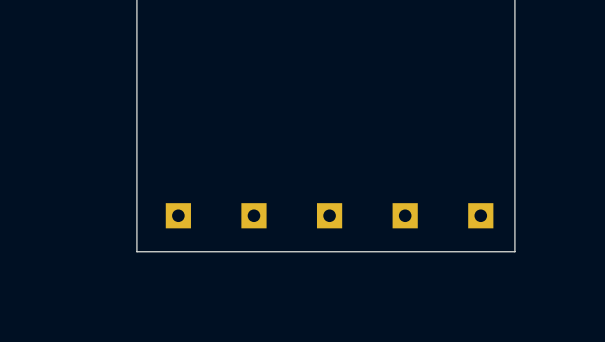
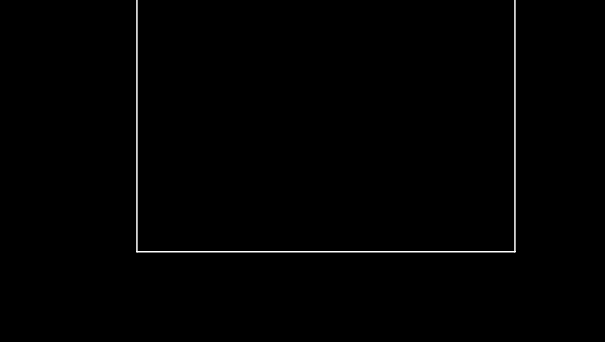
part: (178, 215) -> none
part: (253, 215) -> none
part: (329, 215) -> none
part: (405, 215) -> none
part: (480, 215) -> none

